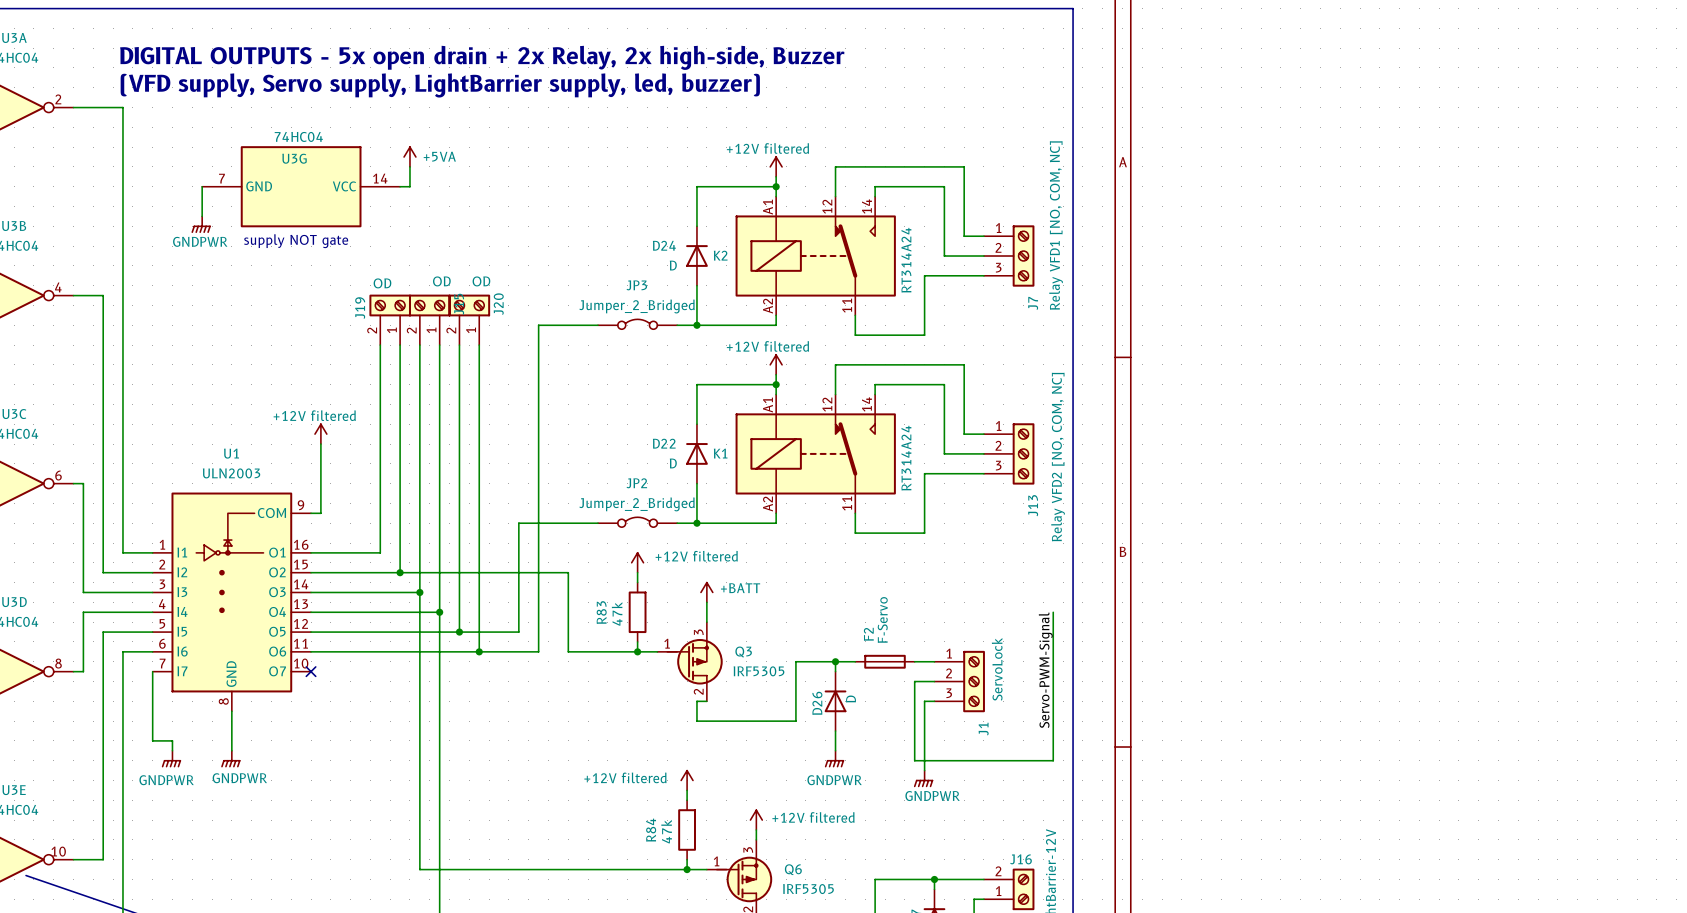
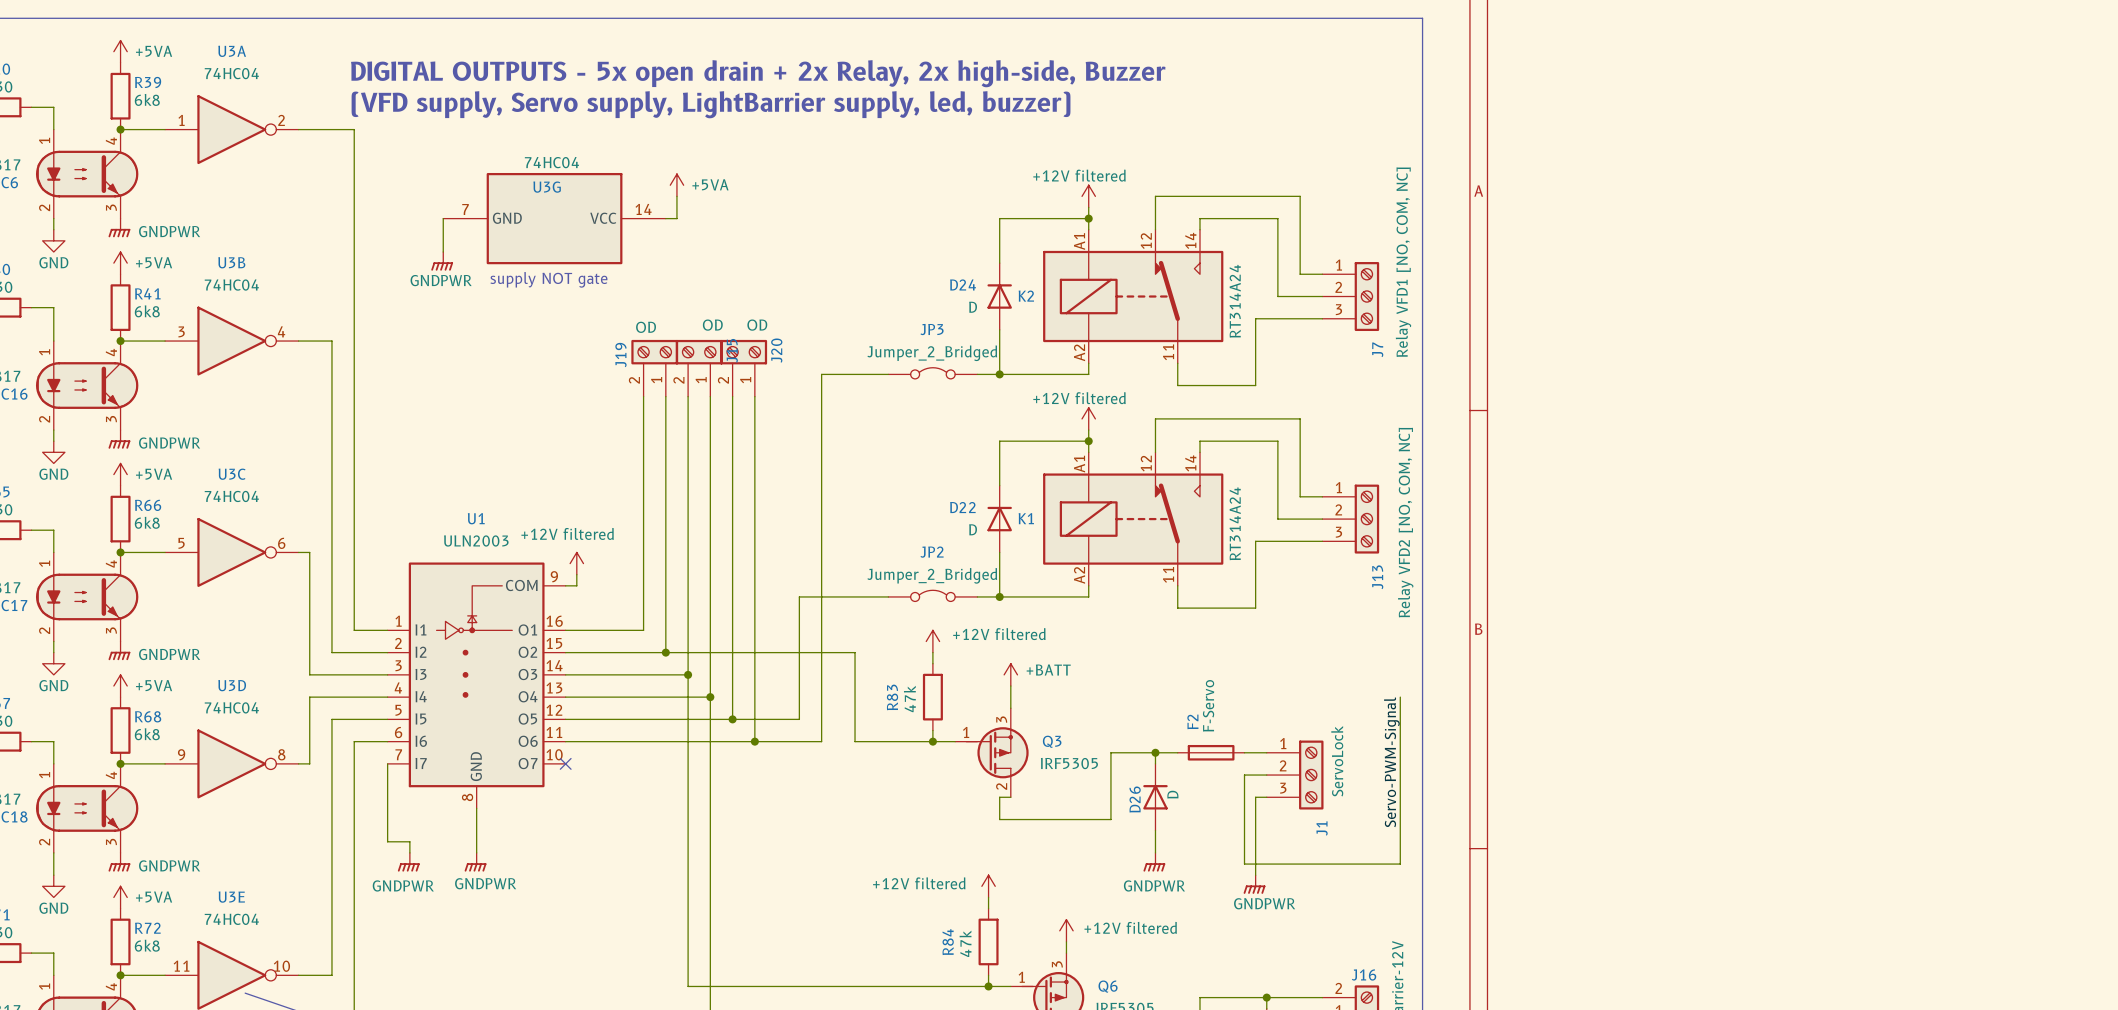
power symbol text position: +12V filtered (314, 415) -> +12V filtered (567, 533)
power symbol position: +12V filtered (320, 434) -> +12V filtered (576, 563)
wire: (320, 444) (320, 503) -> none

